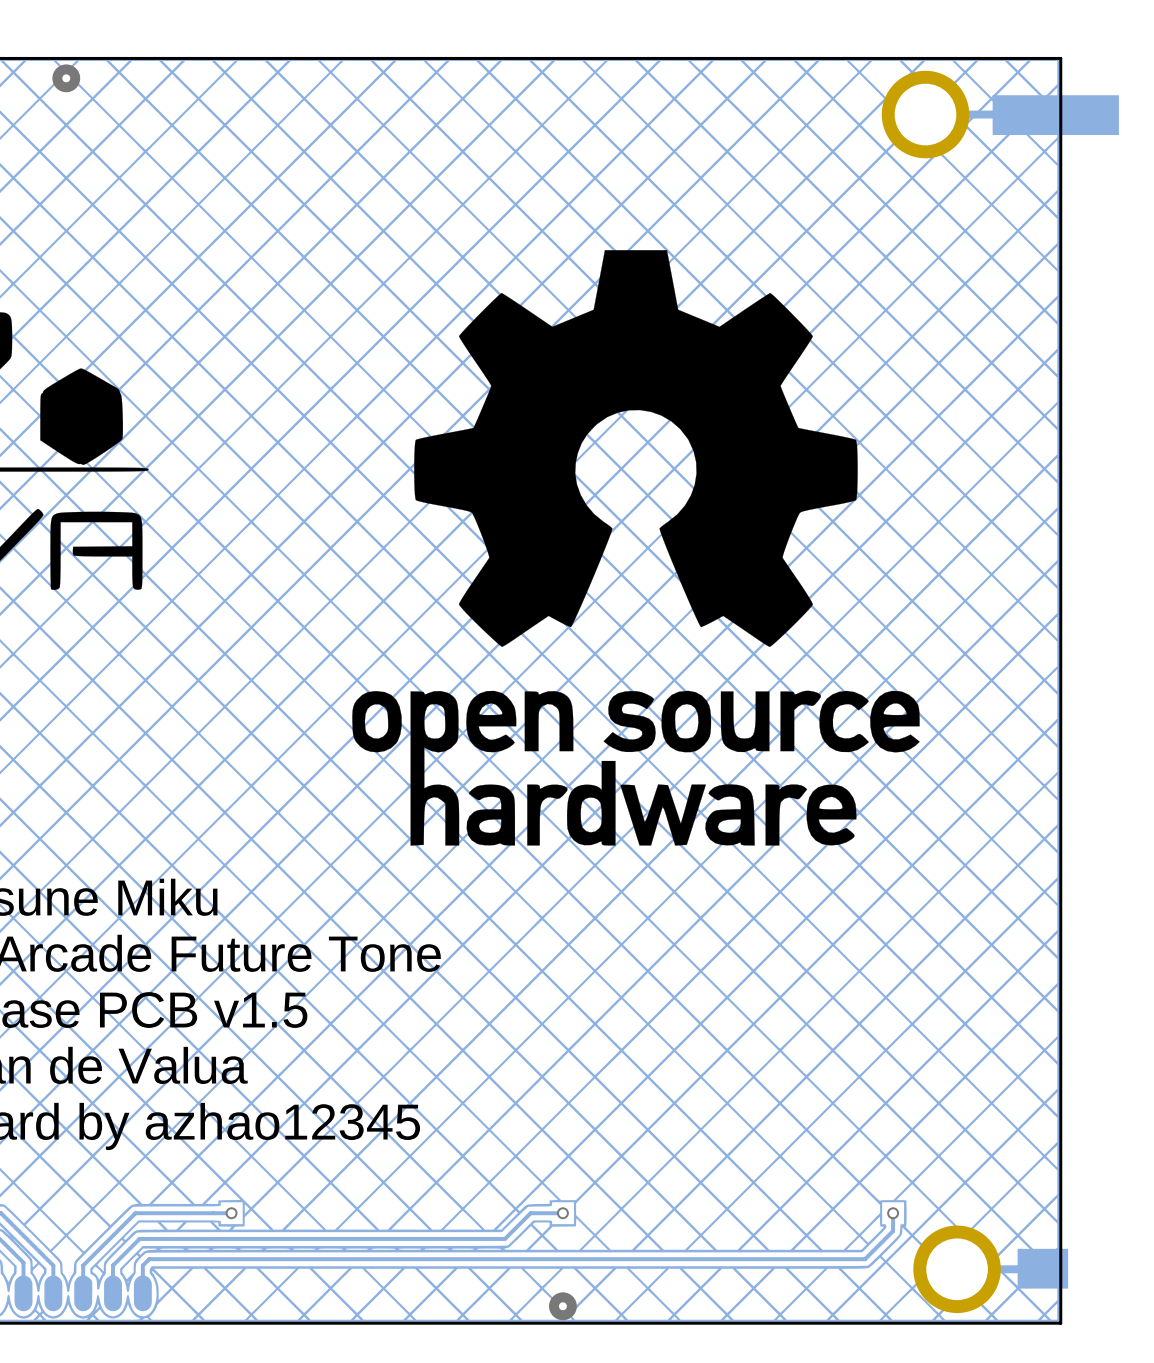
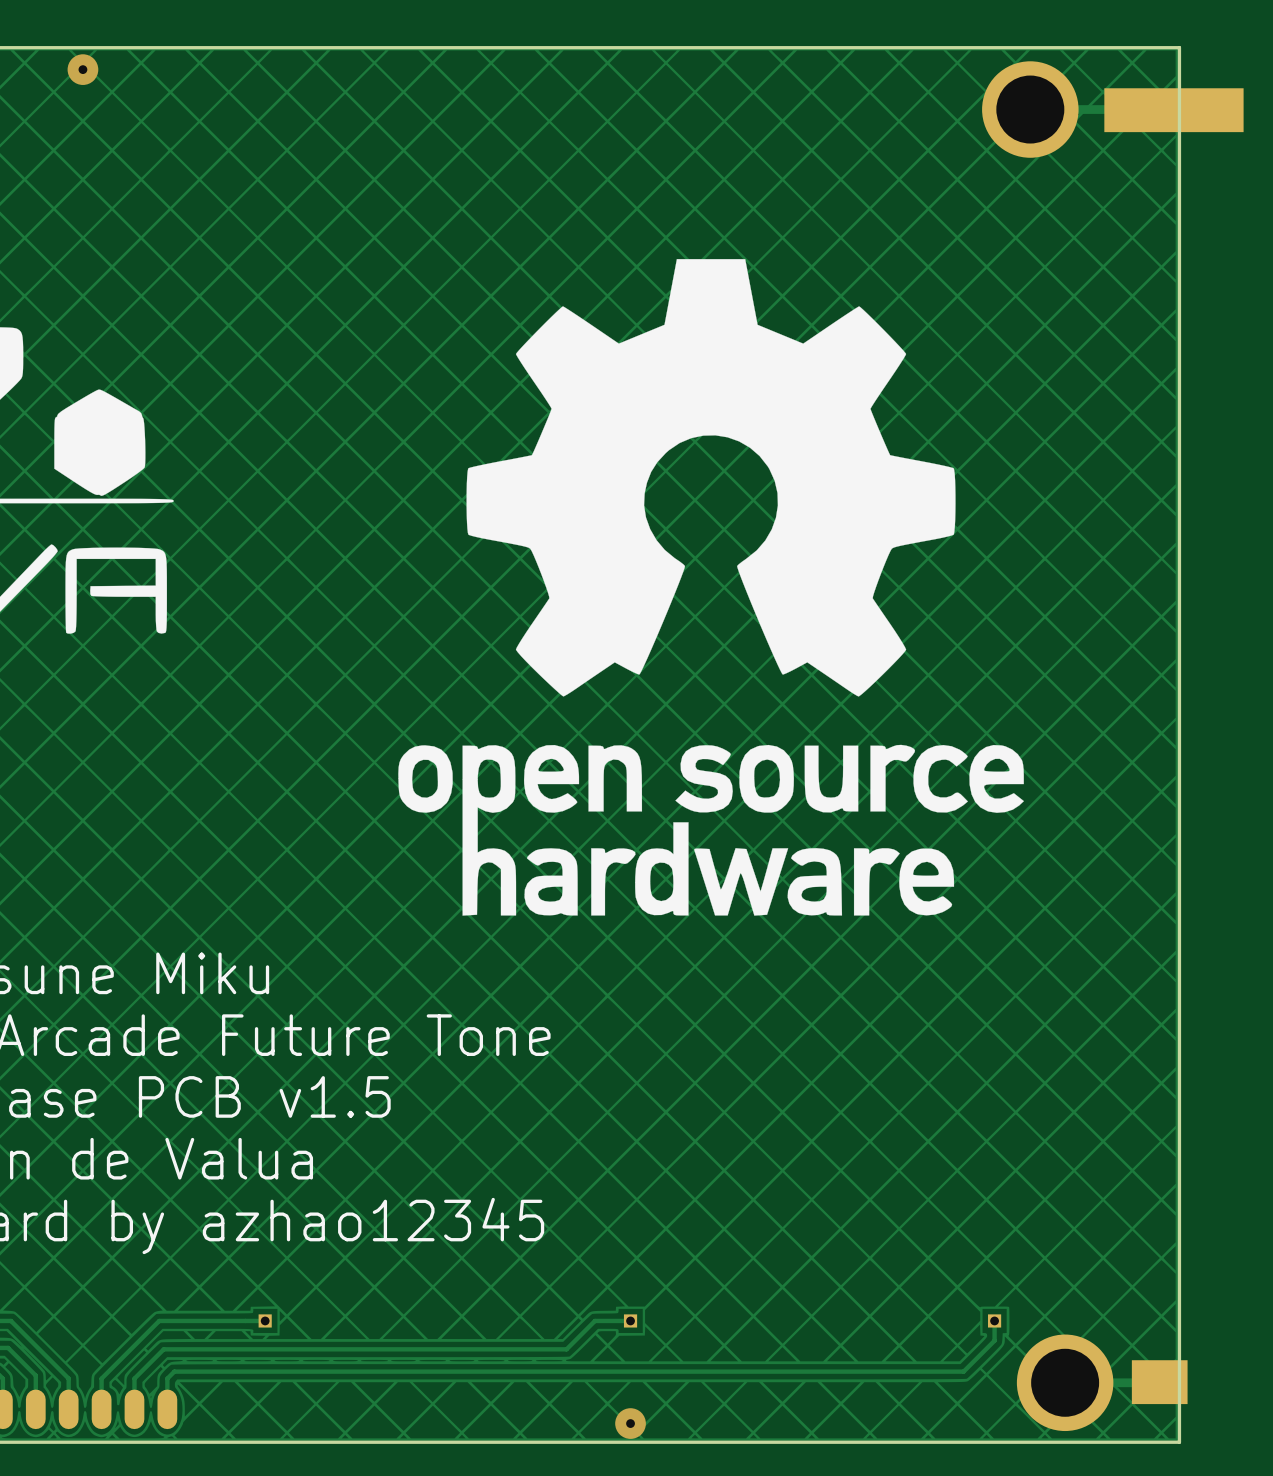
via: (231, 1213) -> none
part: none -> (265, 1320)
via: (562, 1213) -> none
part: none -> (630, 1320)
via: (893, 1213) -> none
part: none -> (994, 1320)

